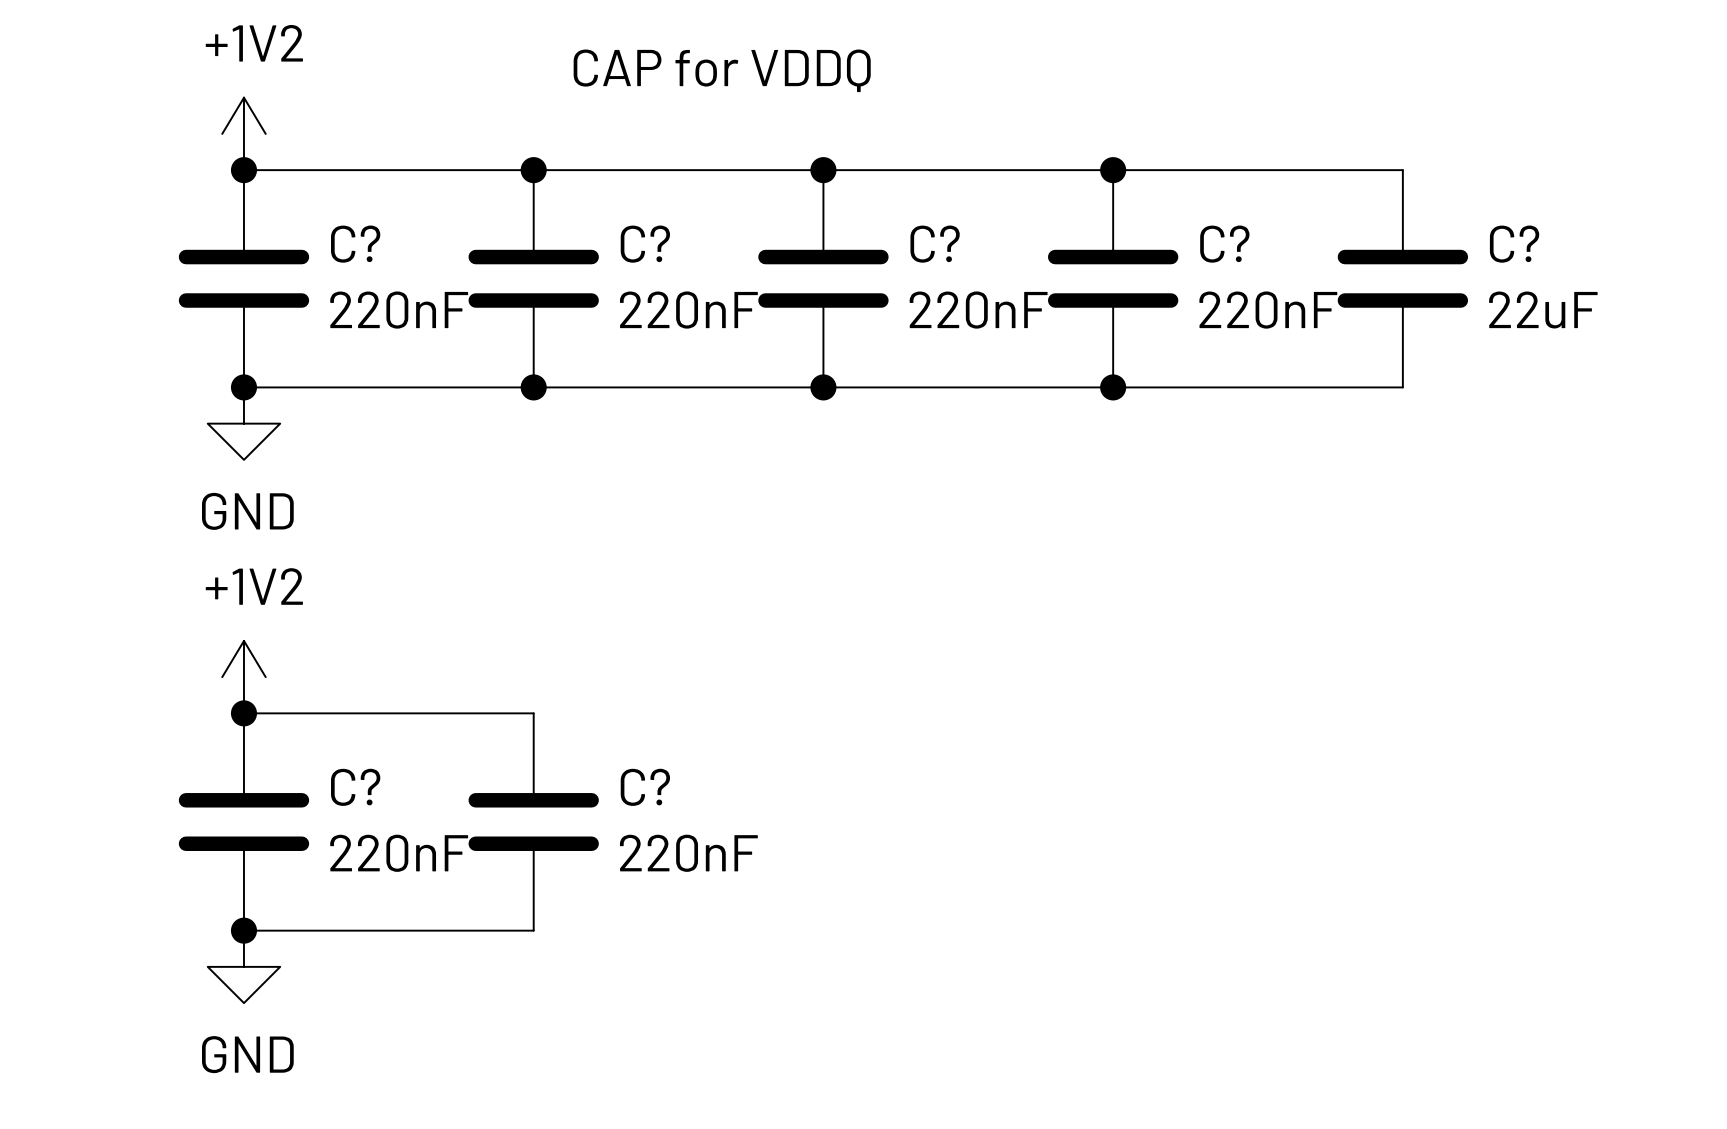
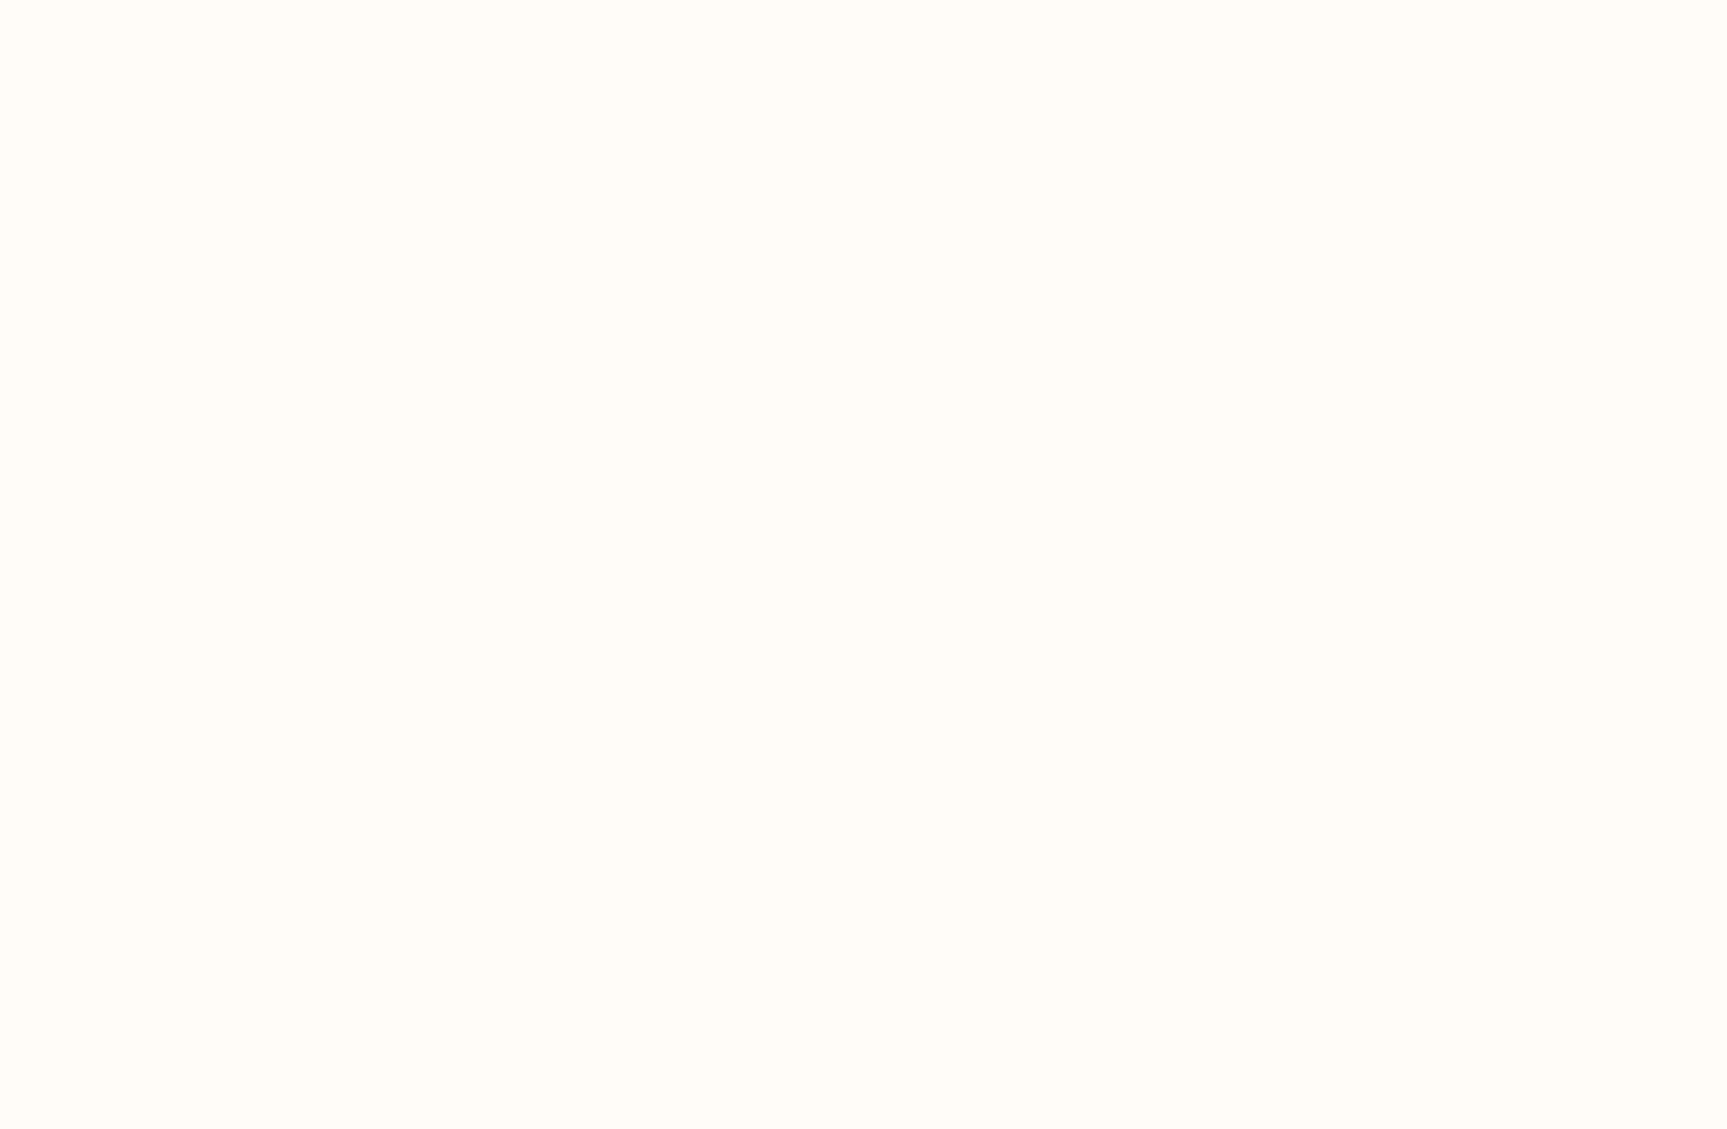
text: CAP for VDDQ (722, 70) -> none
power symbol: +1V2 (243, 133) -> none
wire: (243, 170) (1402, 170) -> none
junction: (243, 170) -> none
junction: (533, 170) -> none
junction: (823, 170) -> none
junction: (1113, 170) -> none
C?: 220nF (243, 278) -> none
C?: 220nF (533, 278) -> none
C?: 220nF (823, 278) -> none
C?: 220nF (1113, 278) -> none
C?: 22uF (1402, 278) -> none
wire: (243, 387) (1402, 387) -> none
junction: (243, 387) -> none
junction: (533, 387) -> none
junction: (823, 387) -> none
junction: (1113, 387) -> none
power symbol: GND (243, 423) -> none
power symbol: +1V2 (243, 677) -> none
wire: (243, 713) (533, 713) -> none
junction: (243, 713) -> none
C?: 220nF (243, 822) -> none
C?: 220nF (533, 822) -> none
wire: (243, 930) (533, 930) -> none
junction: (243, 930) -> none
power symbol: GND (243, 966) -> none

